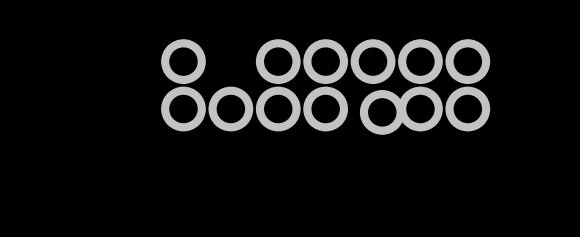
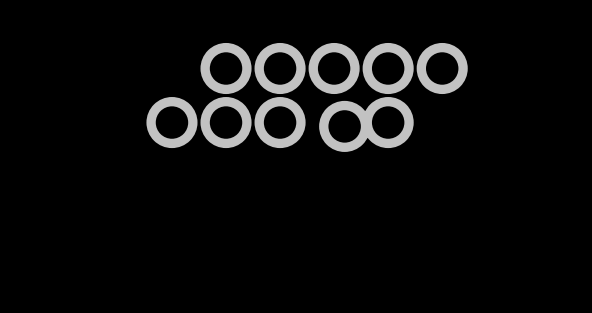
via: (183, 61) -> none
via: (183, 109) -> none
via: (467, 109) -> none

